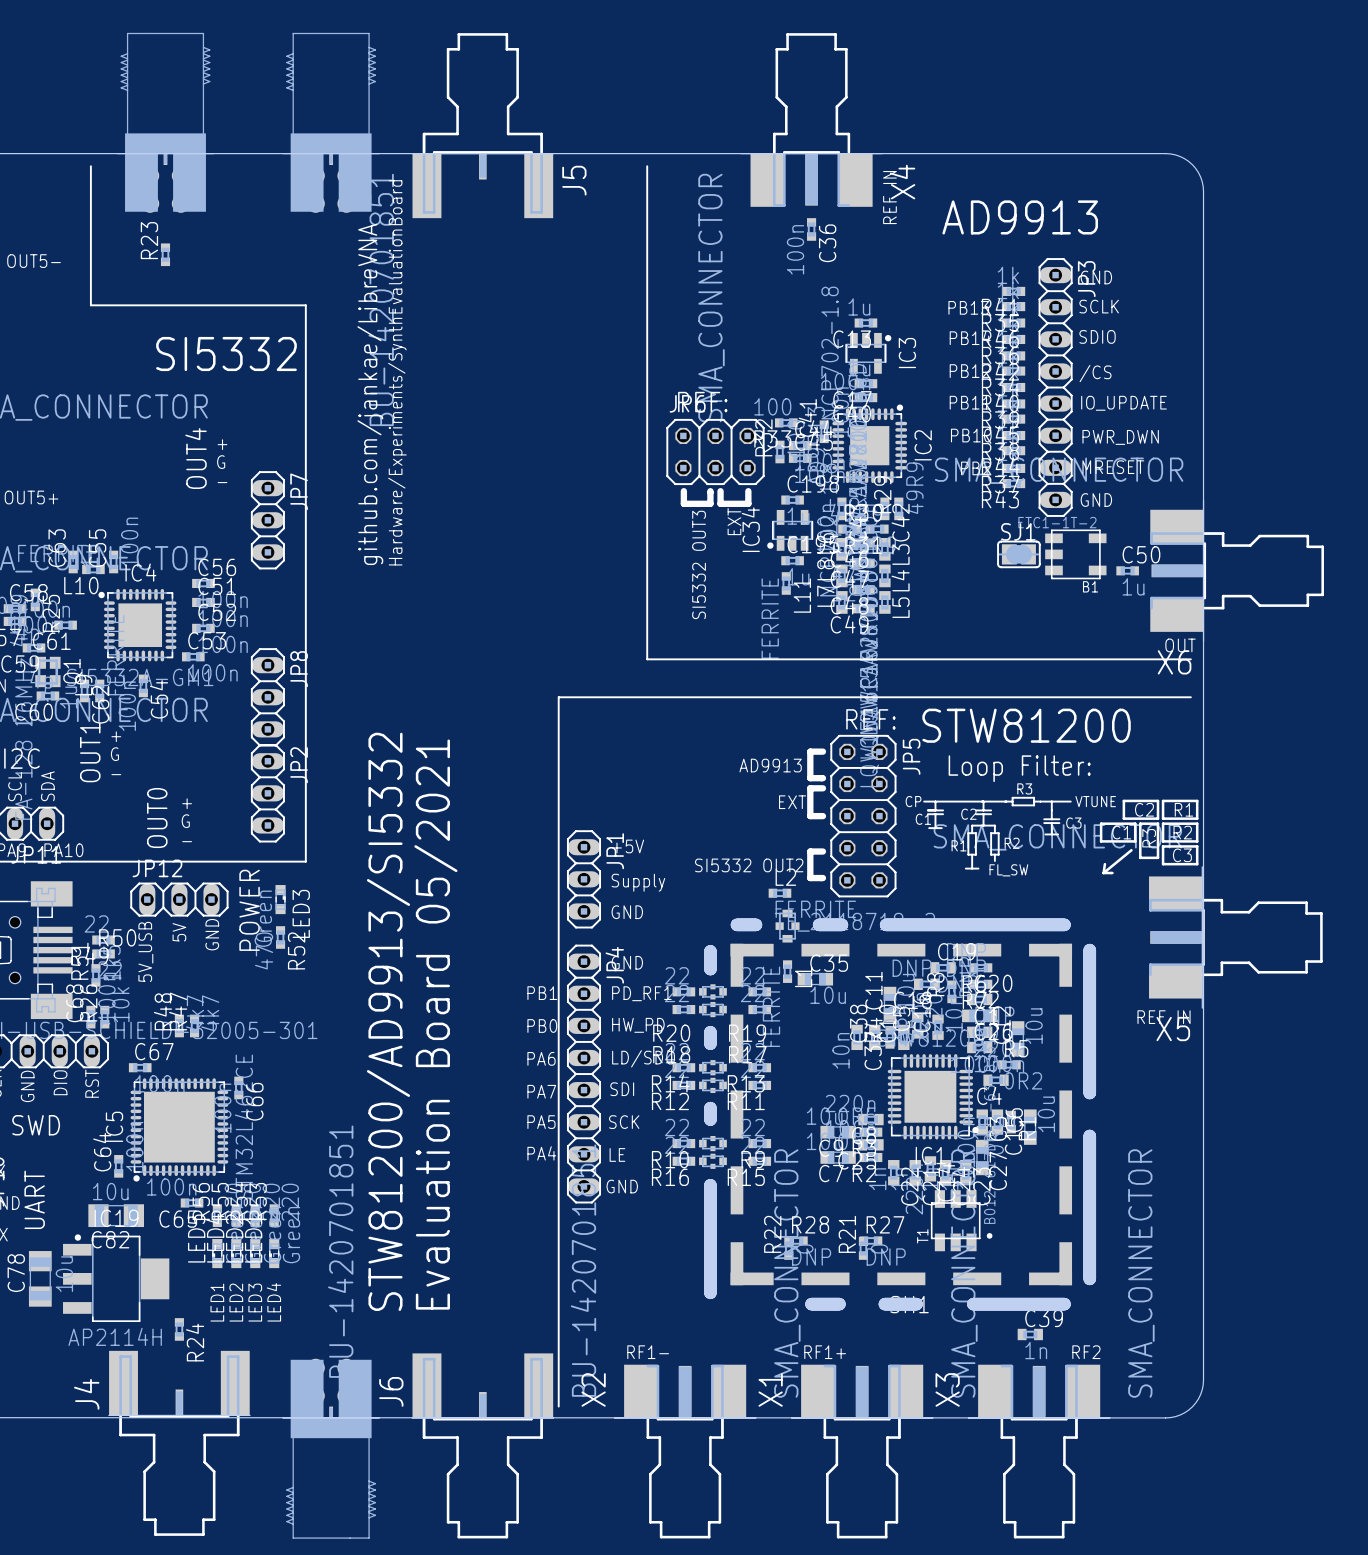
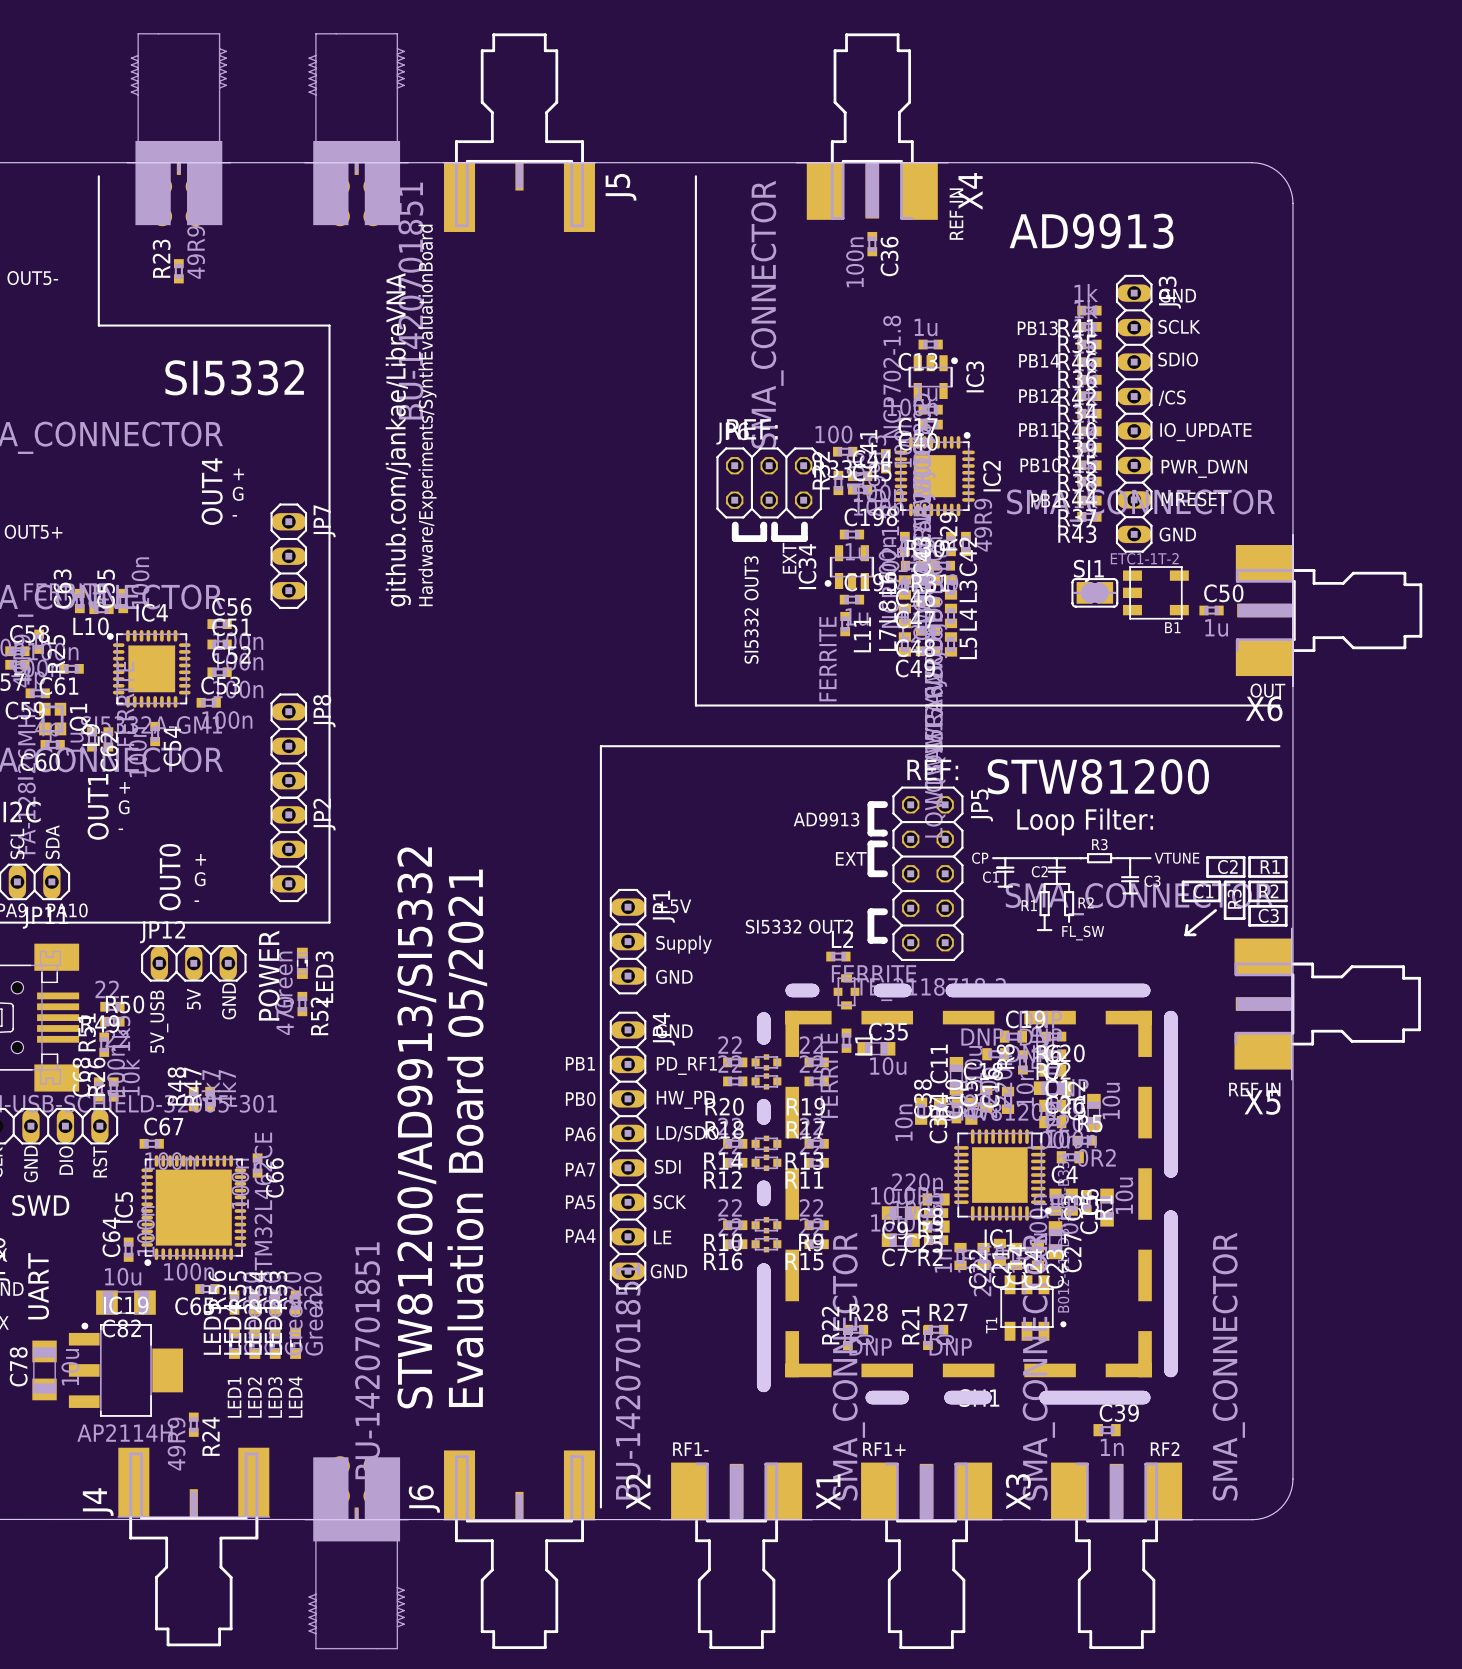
R23 value: none -> 49R9 (196, 252)
R24 value: none -> 49R9 (176, 1444)

